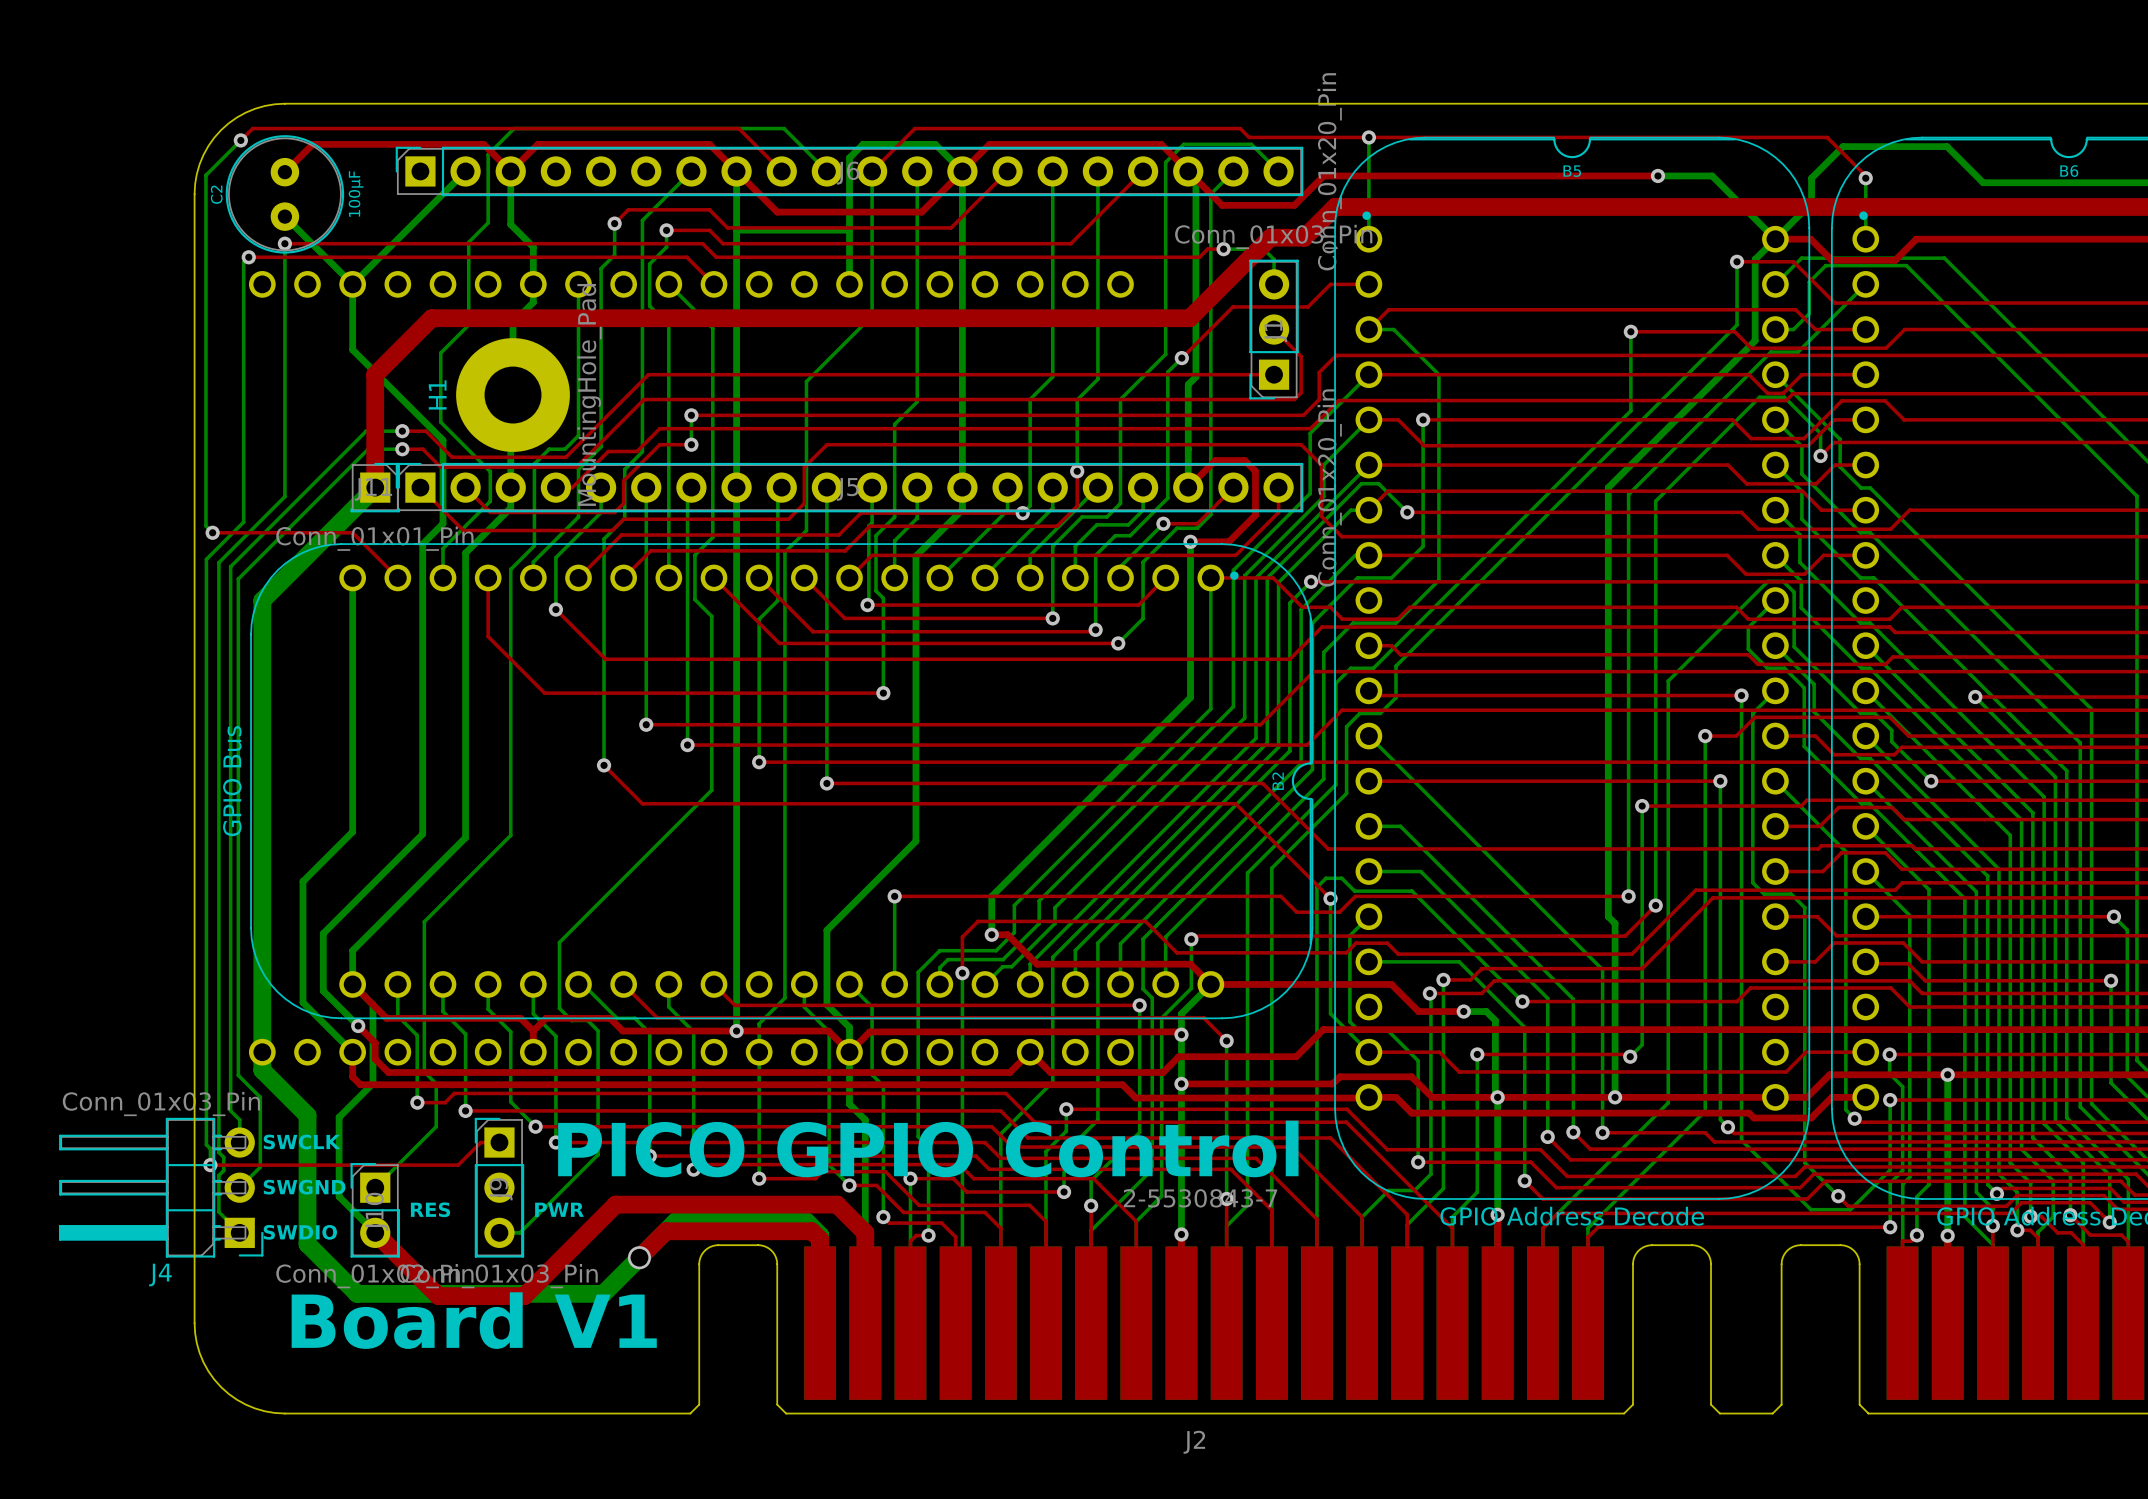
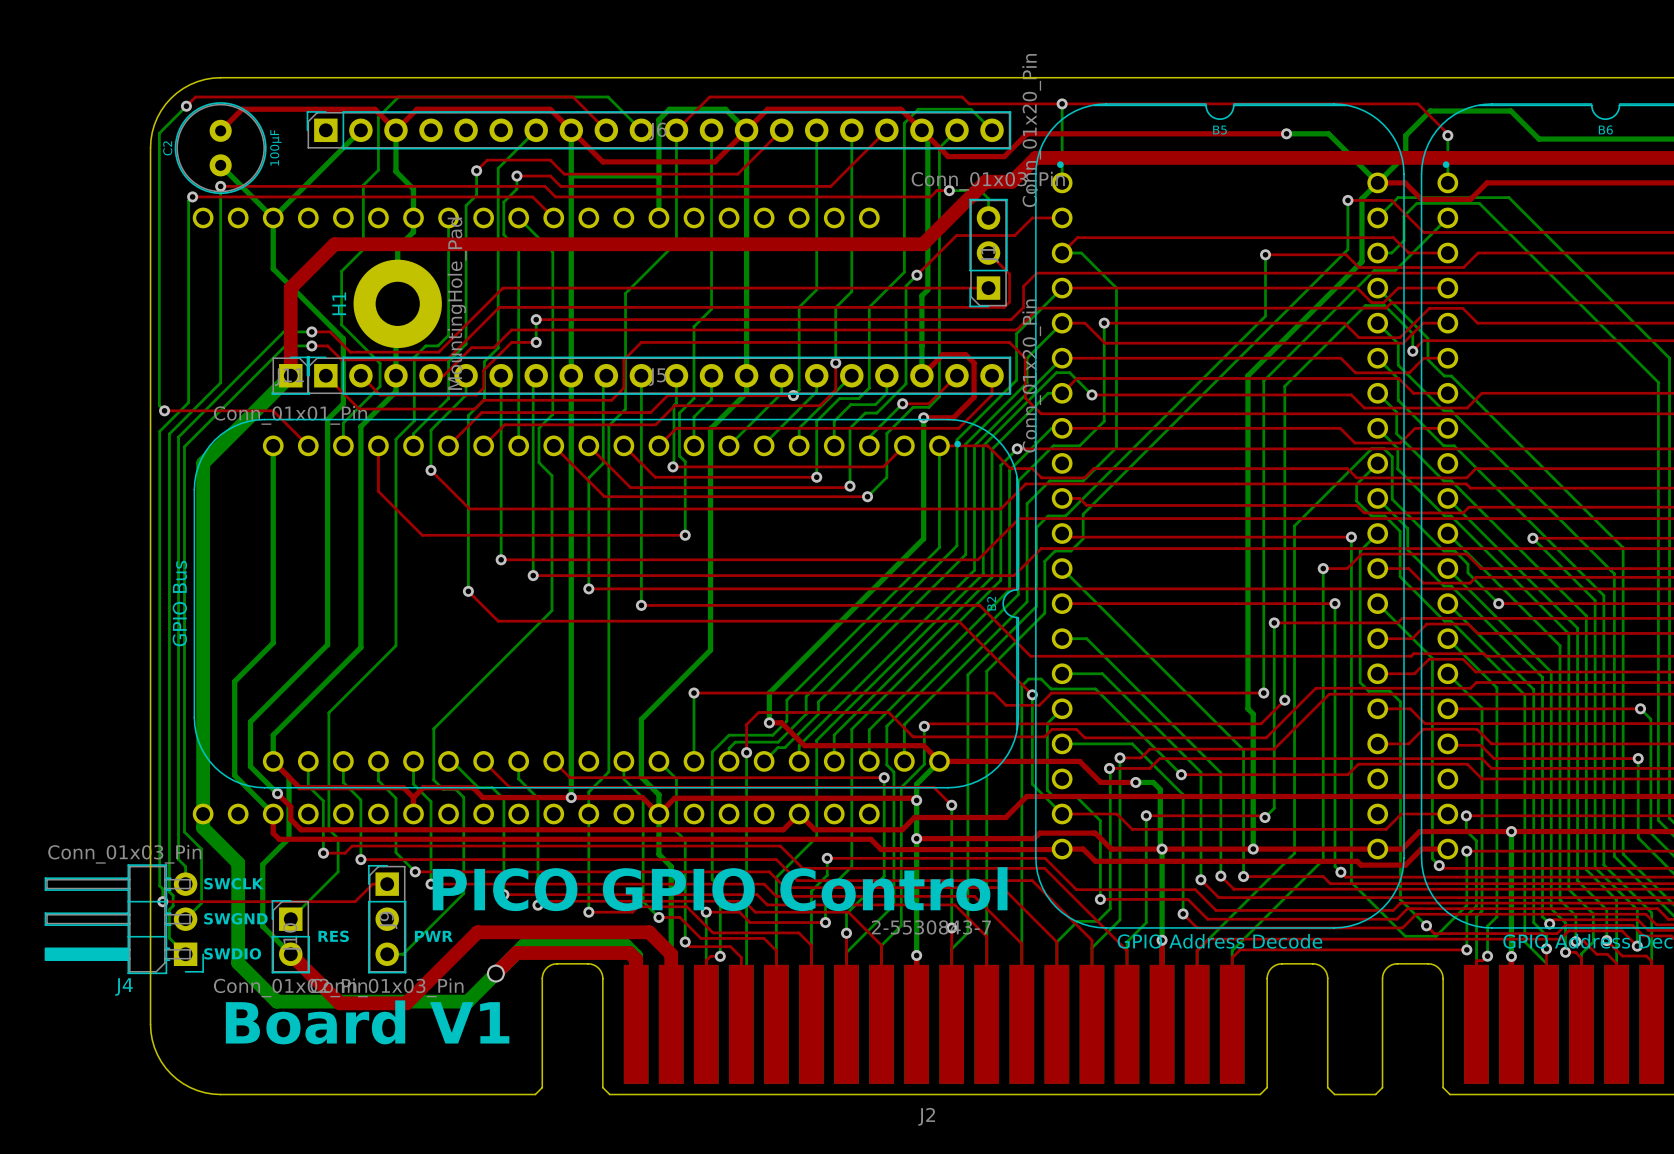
J4 footprint: [59, 1117, 264, 1258] -> [44, 864, 204, 975]

